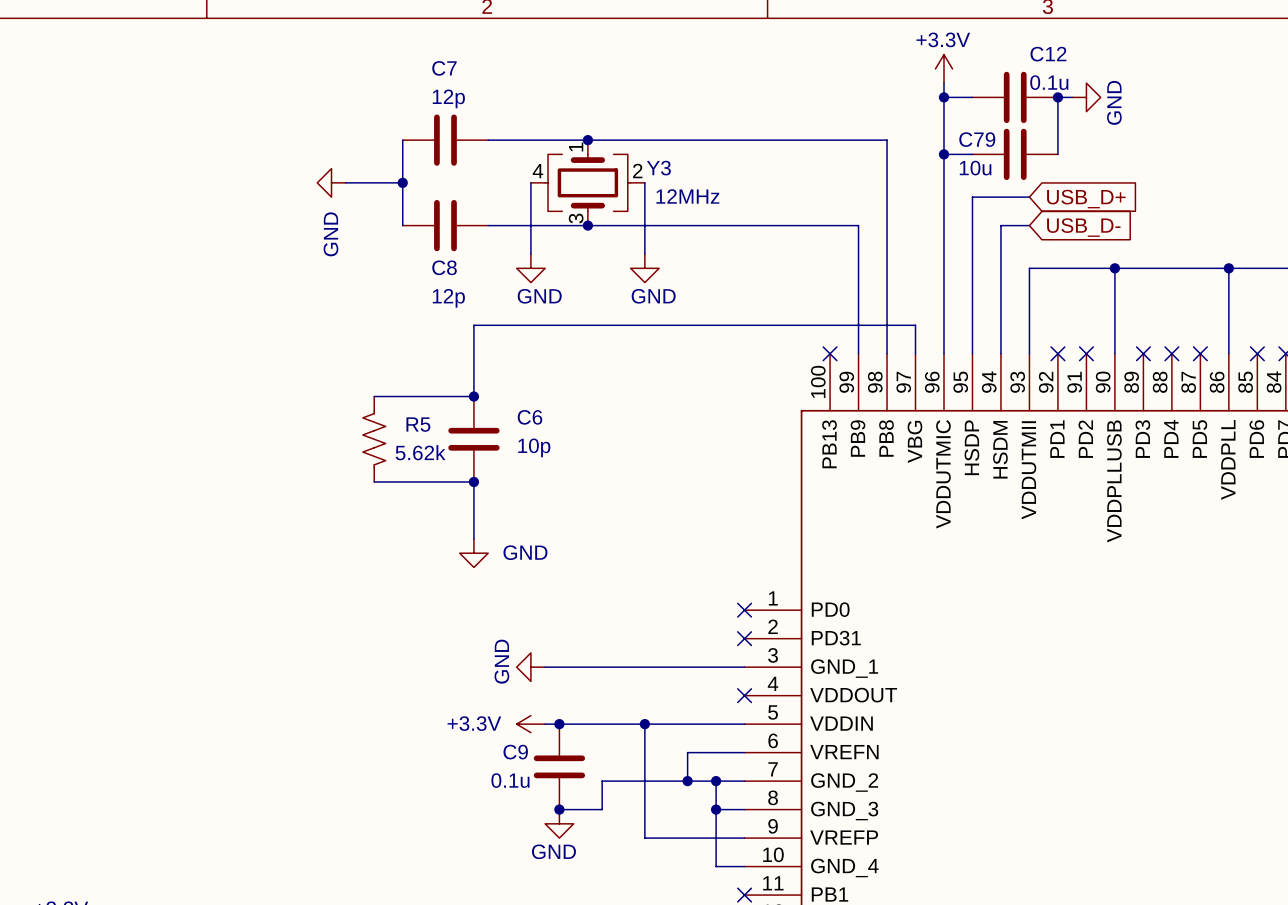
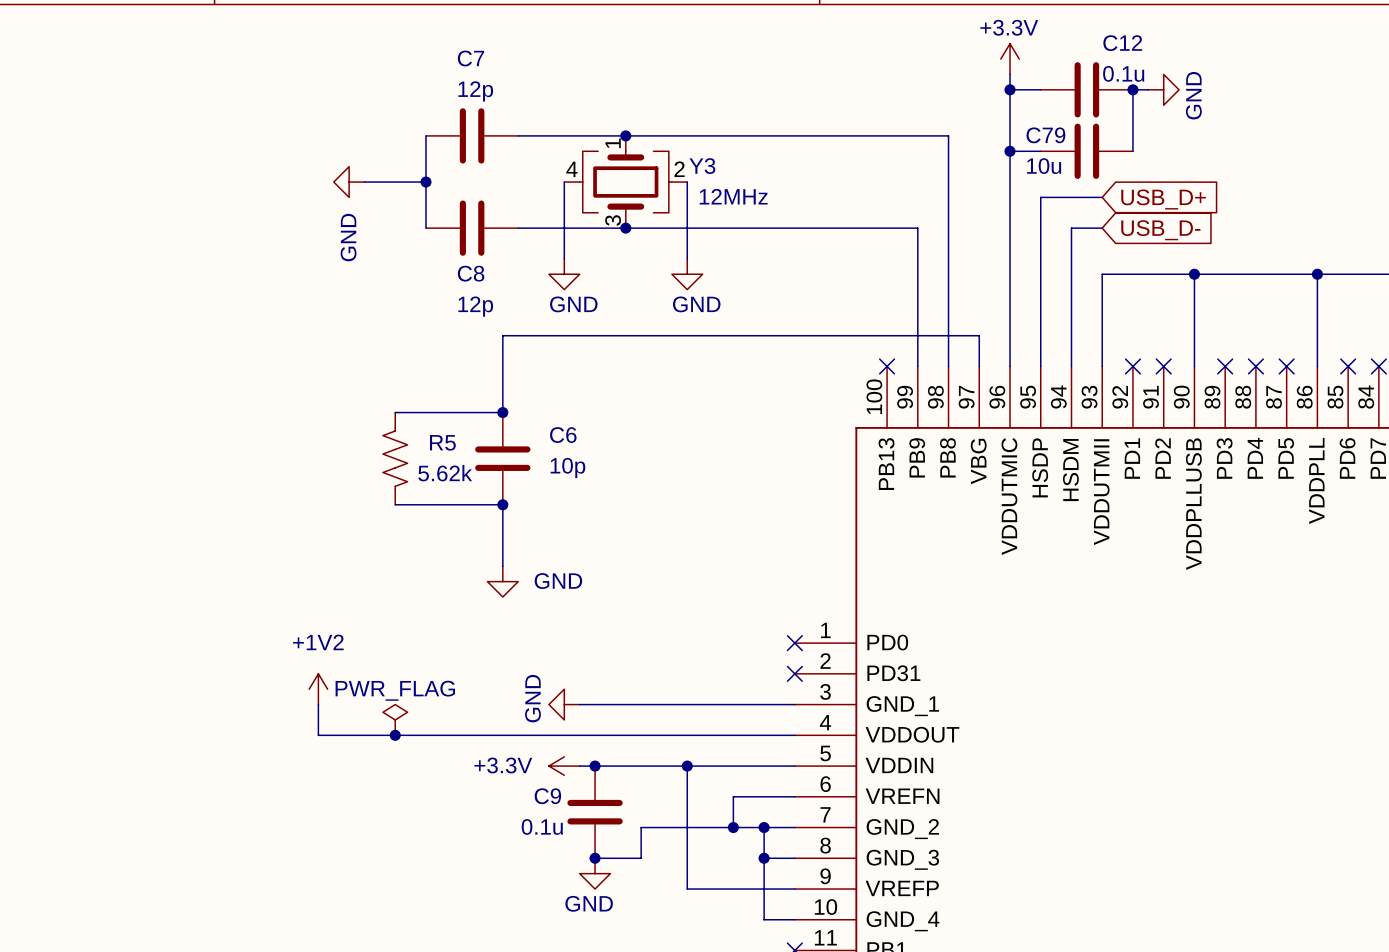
power symbol: none -> +1V2 (318, 689)
wire: none -> (318, 704) (318, 735) (794, 735)
power symbol: none -> PWR_FLAG (395, 719)
junction: none -> (395, 735)
no-connect mark: (744, 695) -> none

